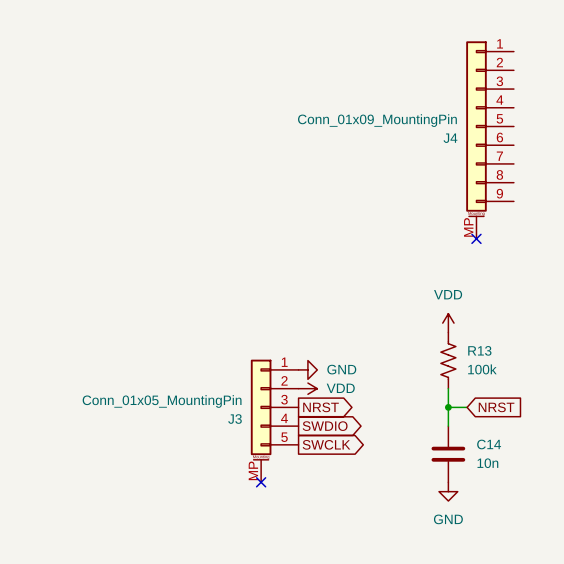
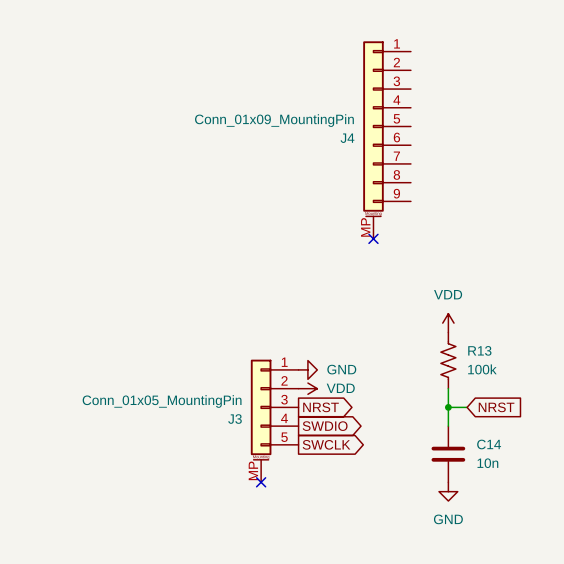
J4 position: (490, 140) -> (387, 140)
no-connect mark: none -> (373, 238)
no-connect mark: (476, 238) -> none

